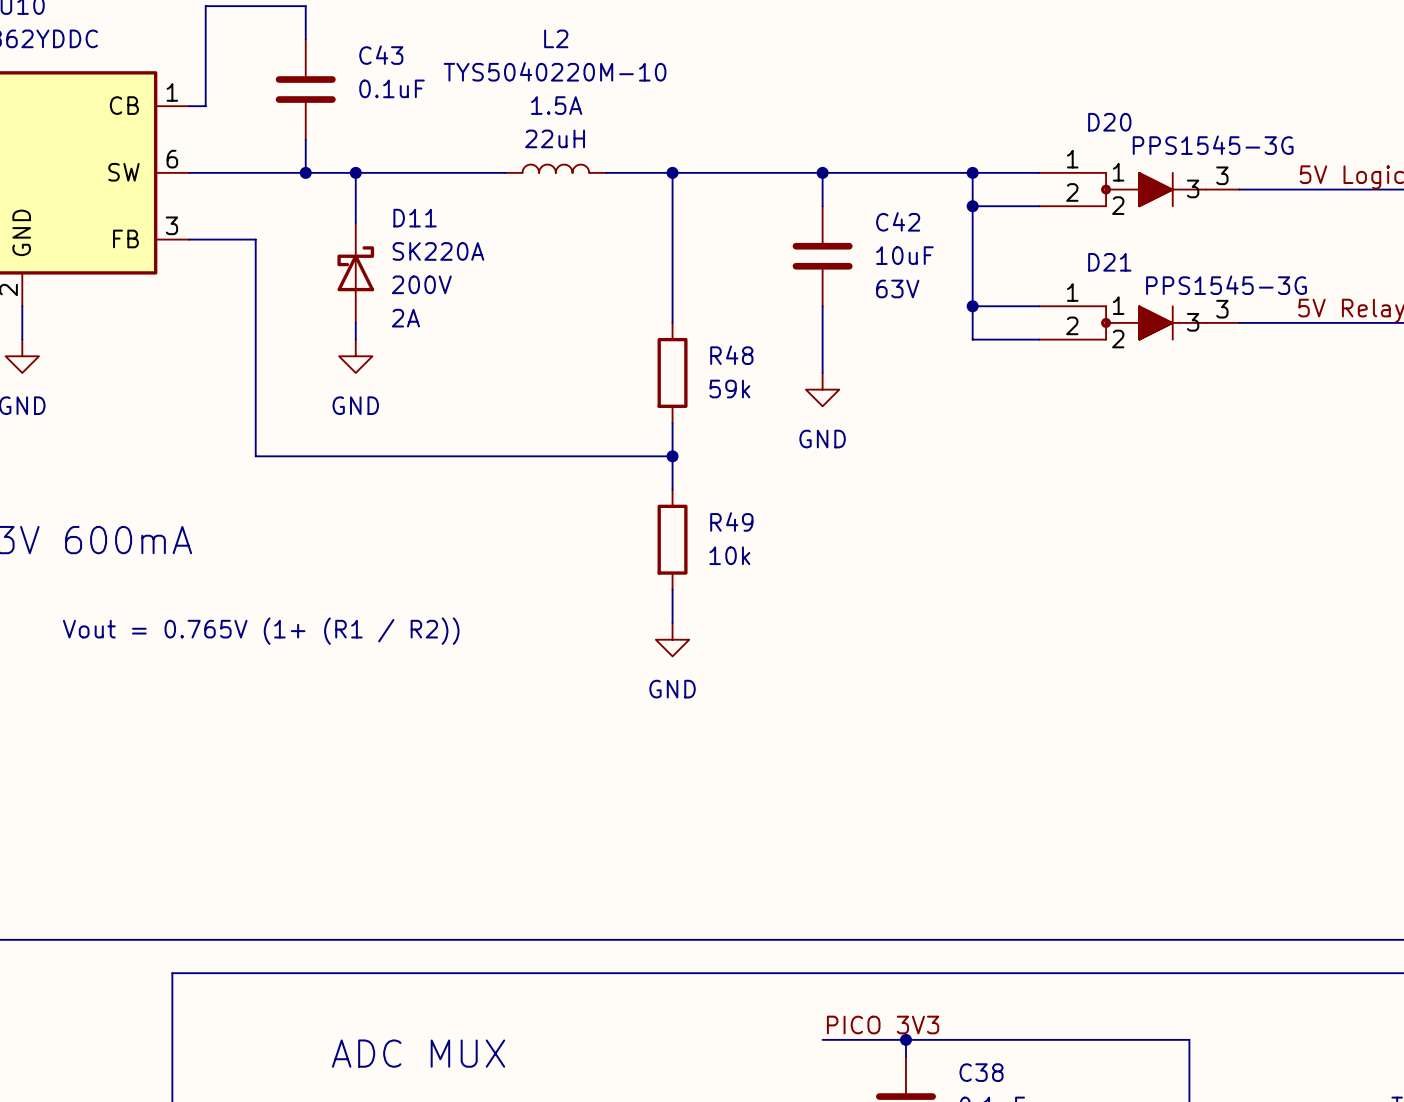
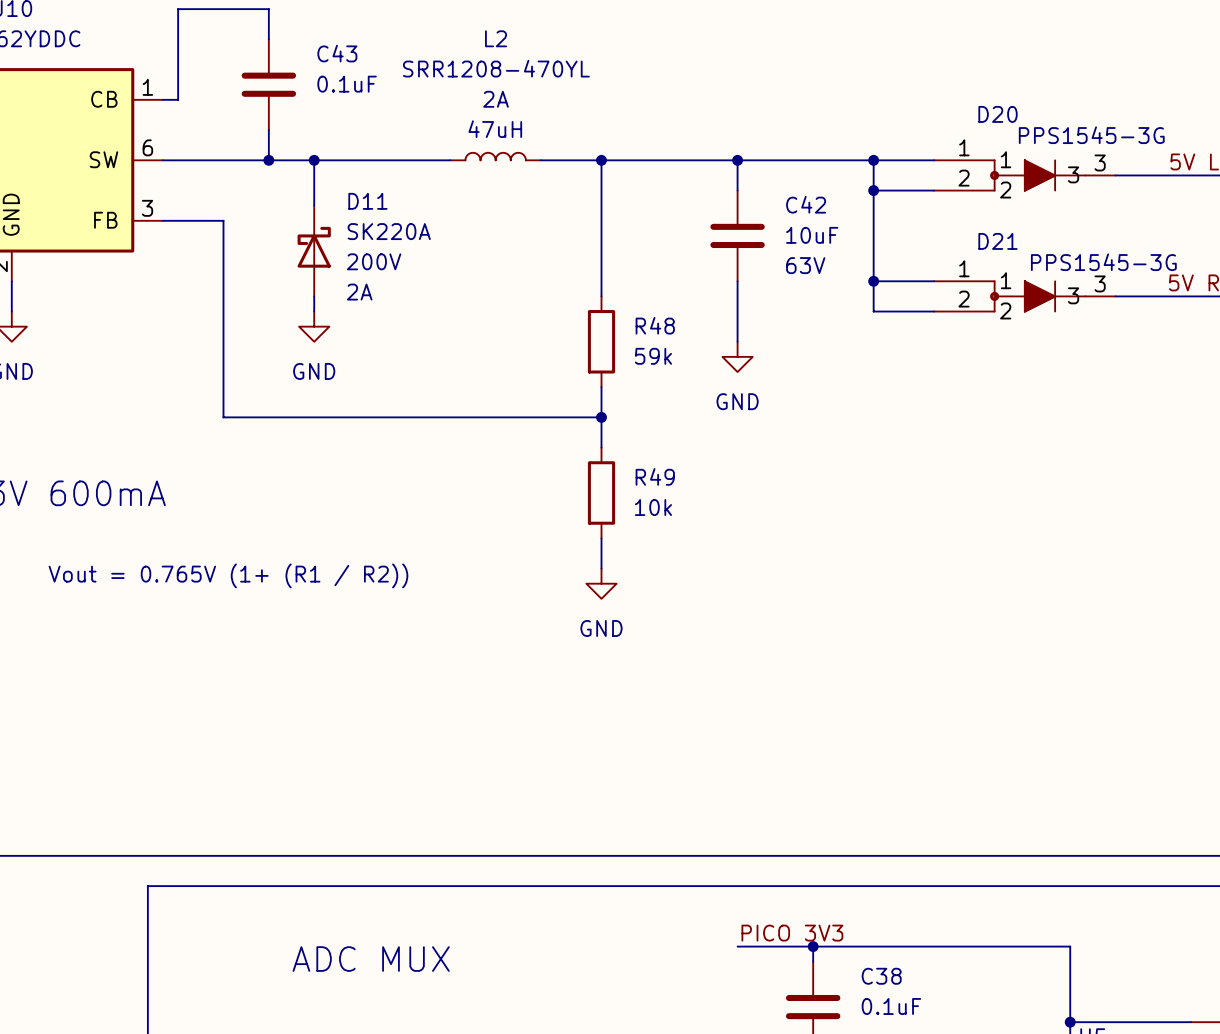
L2 value: TYS5040220M-10 (555, 71) -> SRR1208-470YL (496, 68)
L2 text: 1.5A (556, 105) -> 2A (496, 99)
L2 text: 22uH (555, 138) -> 47uH (495, 129)

